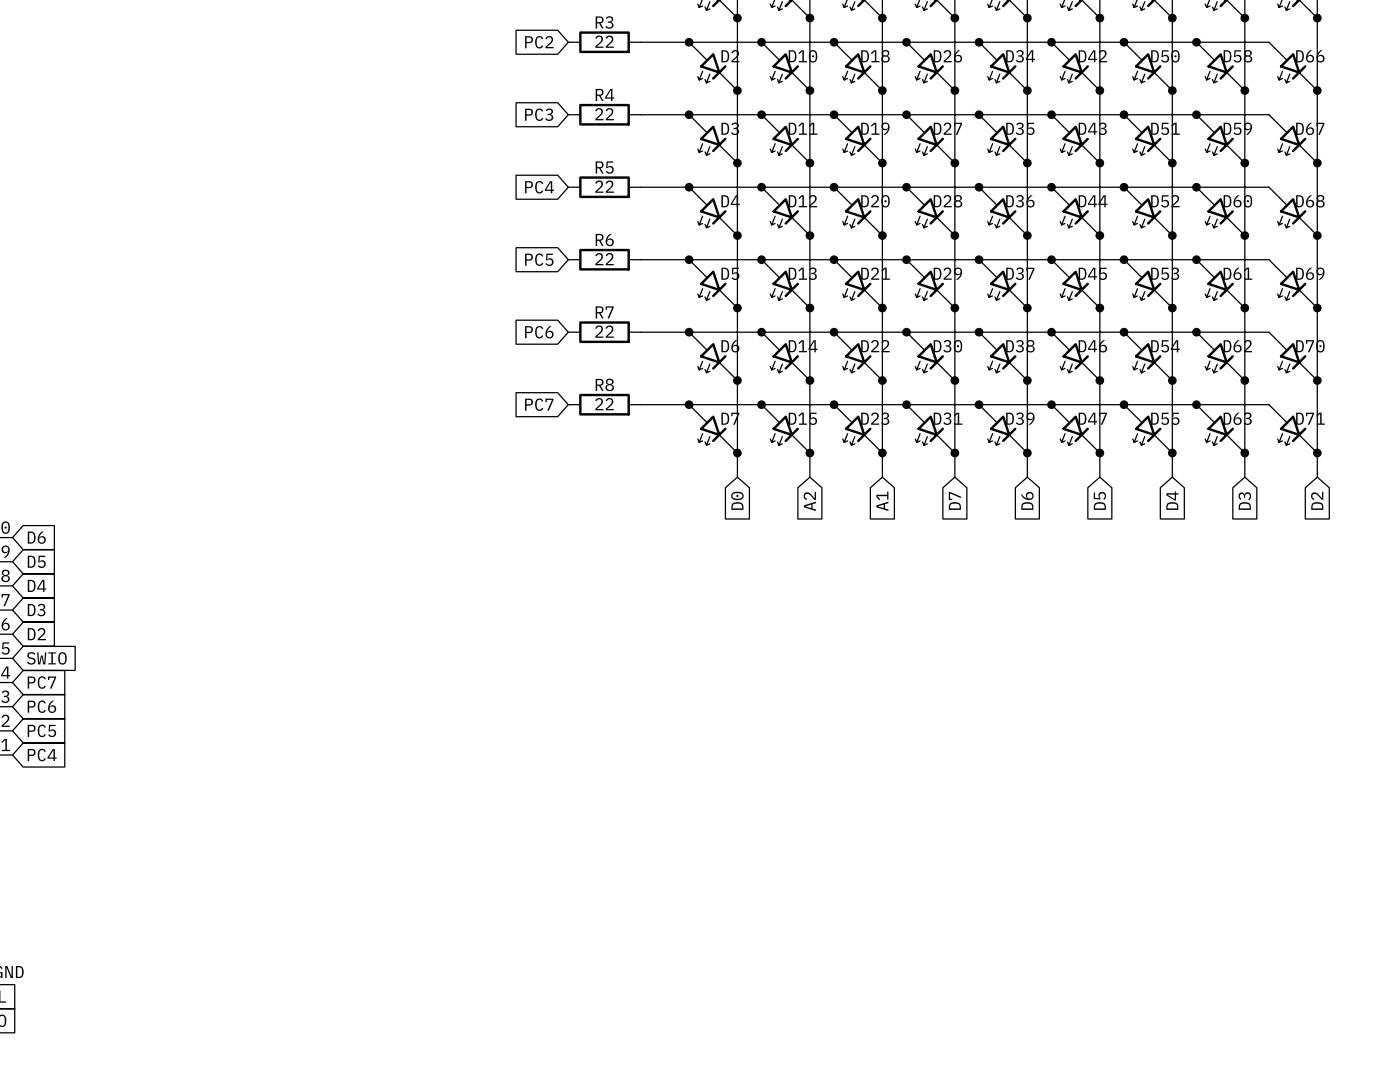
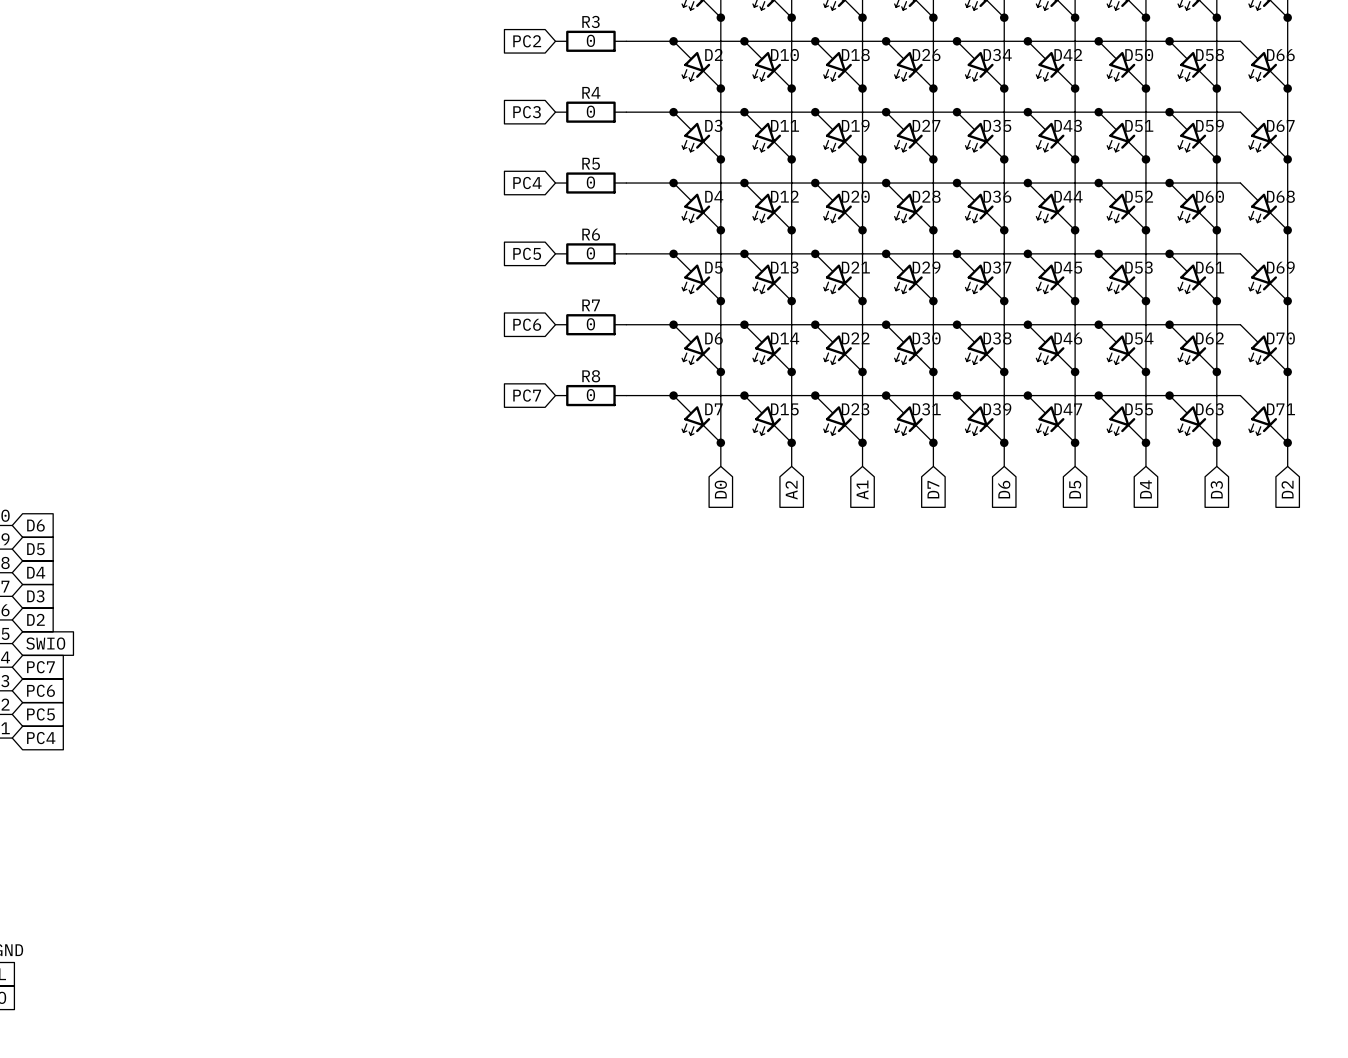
R3 value: 22 (604, 41) -> 0 (590, 40)
R4 value: 22 (604, 114) -> 0 (590, 111)
R5 value: 22 (604, 186) -> 0 (590, 182)
R6 value: 22 (604, 259) -> 0 (590, 253)
R7 value: 22 (604, 331) -> 0 (590, 324)
R8 value: 22 (604, 404) -> 0 (590, 395)

